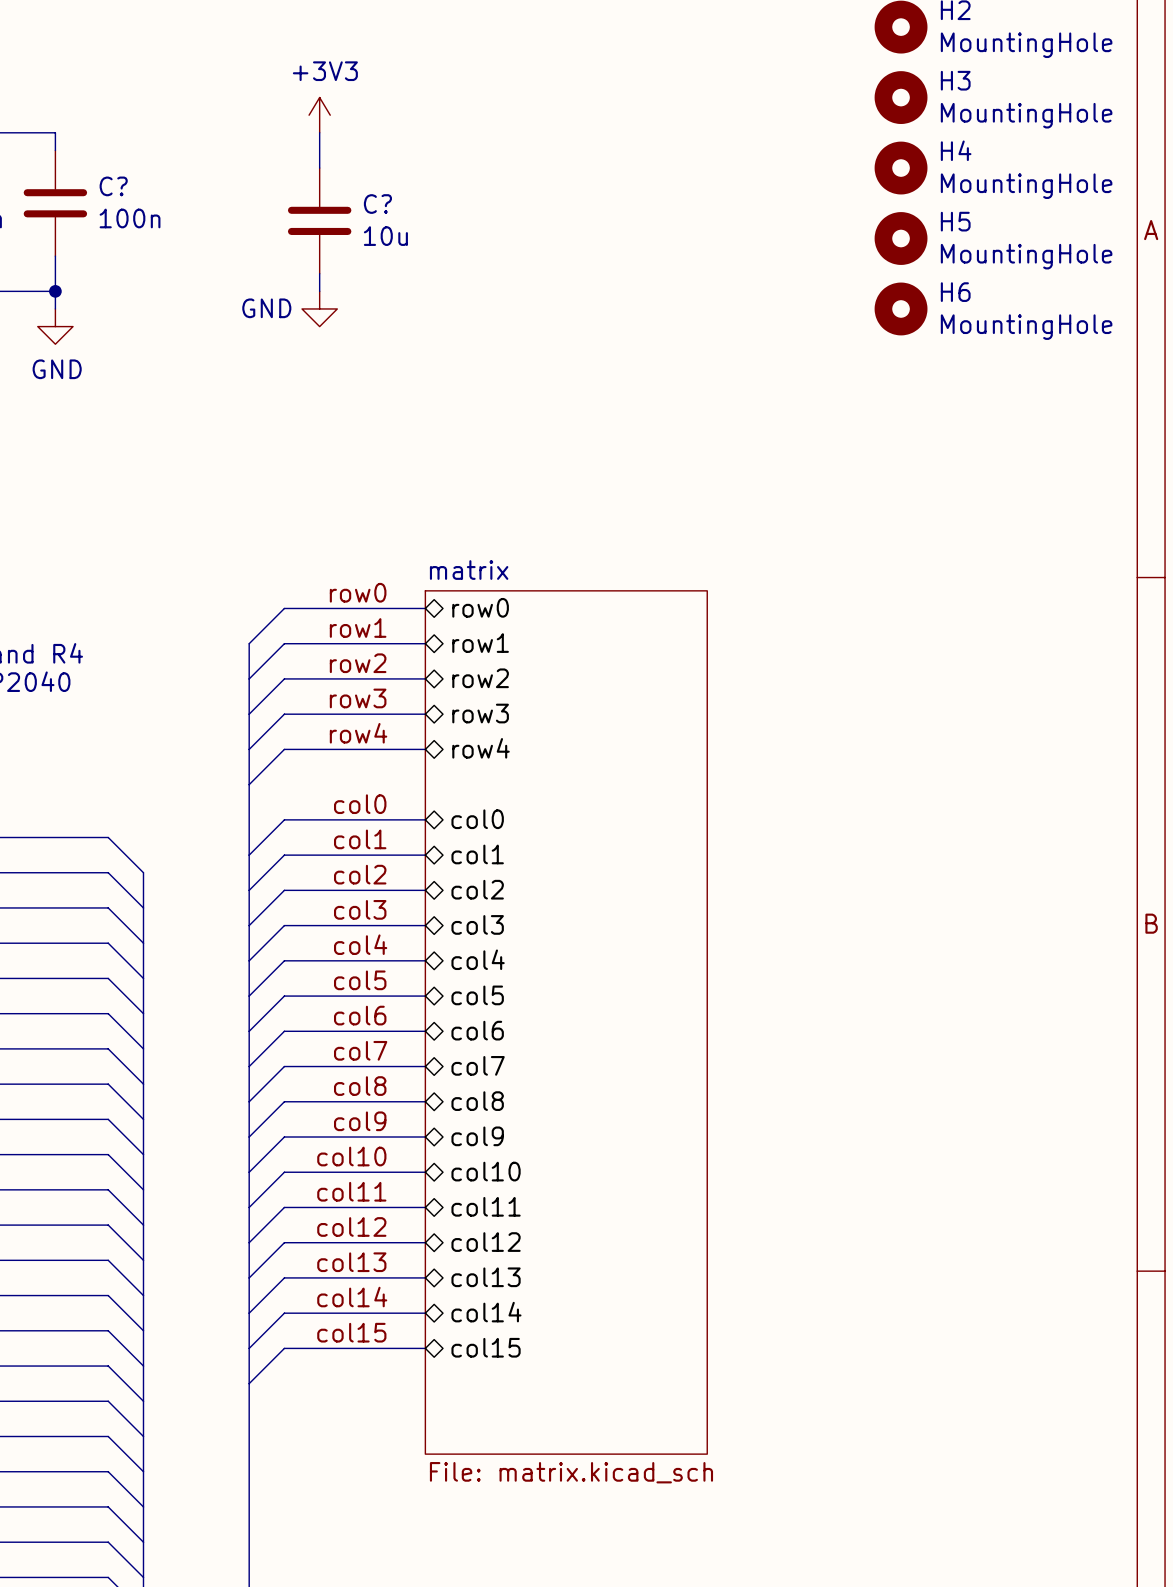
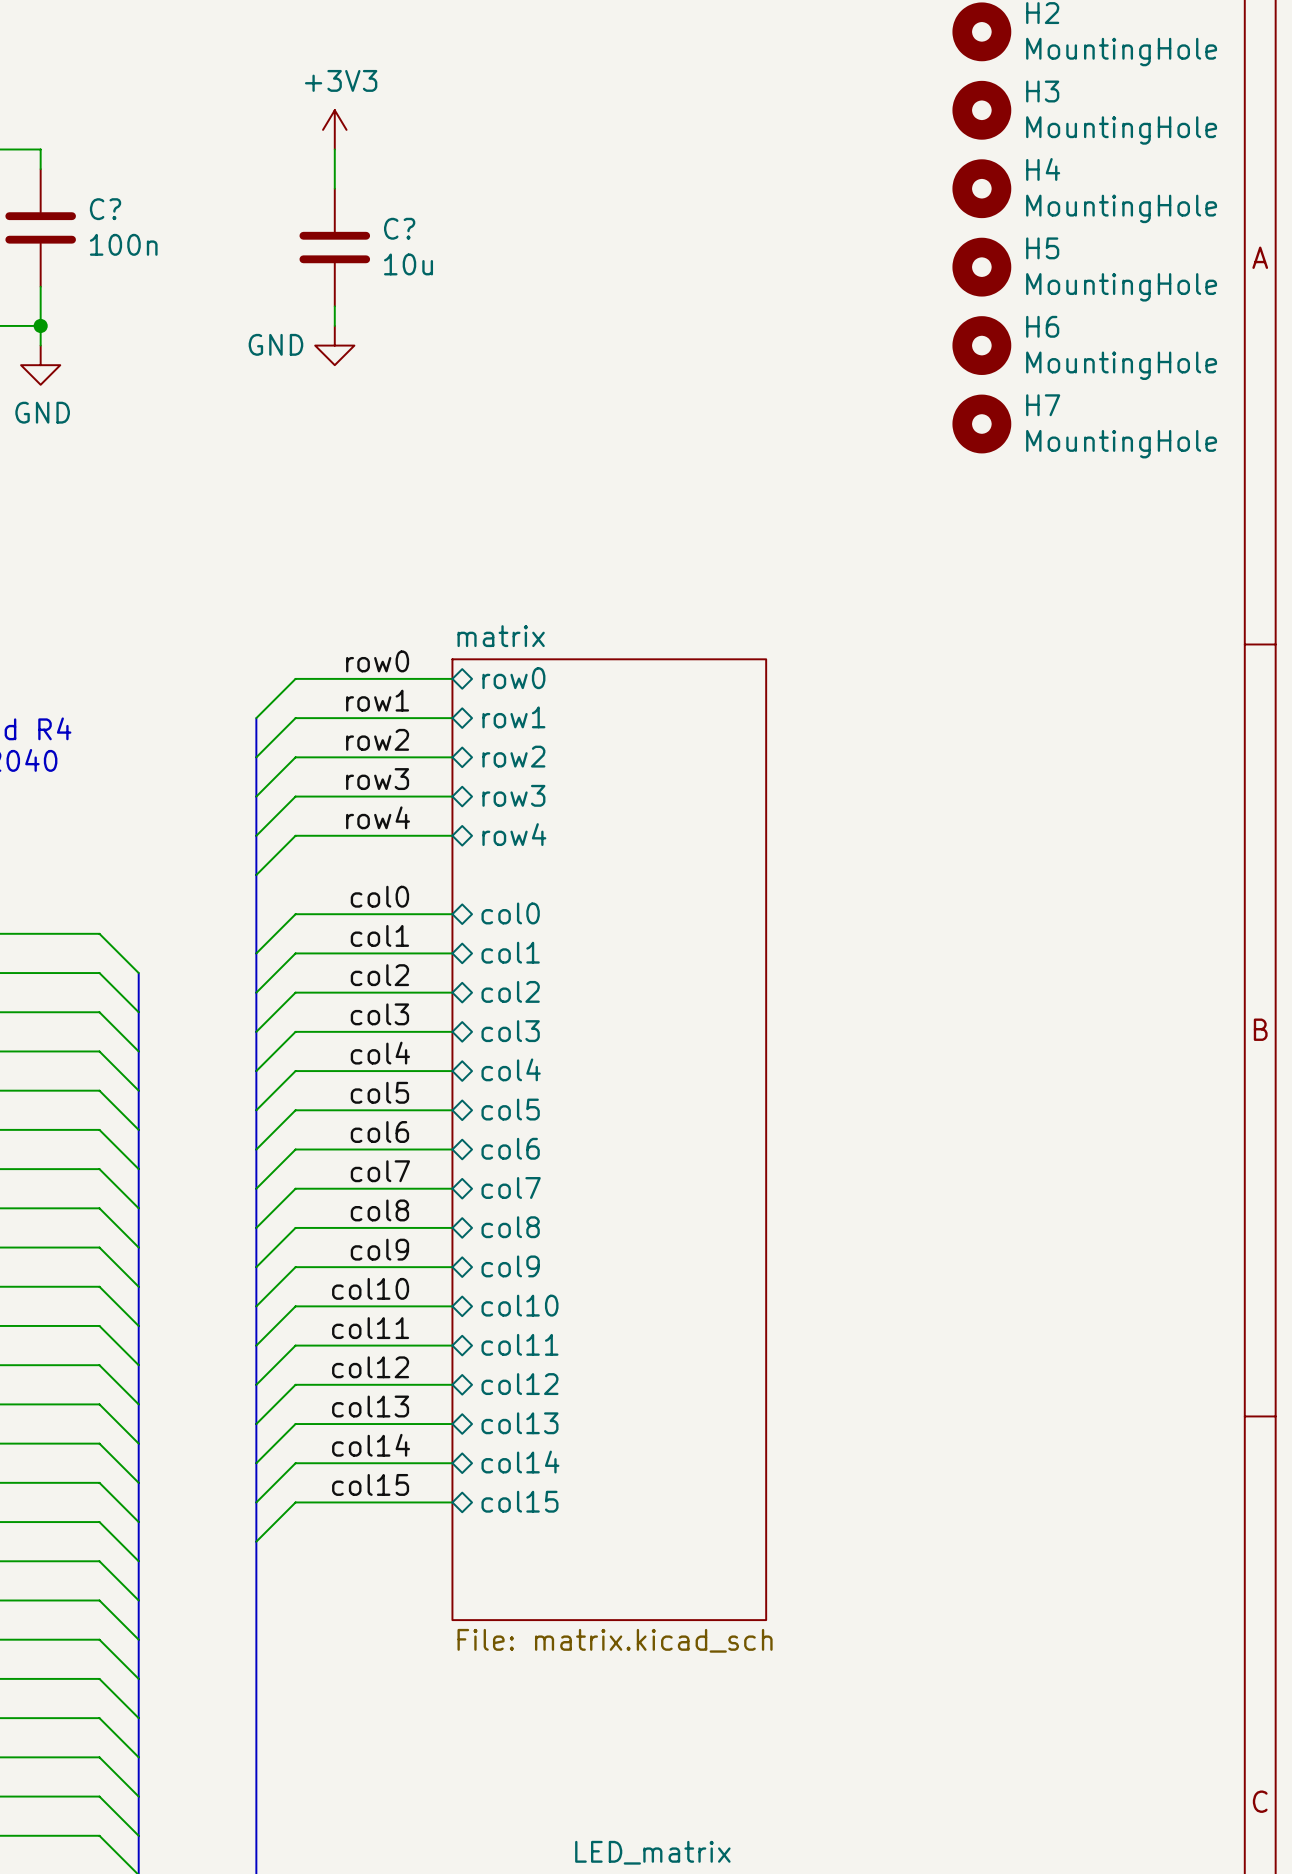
H7: none -> MountingHole (981, 424)

